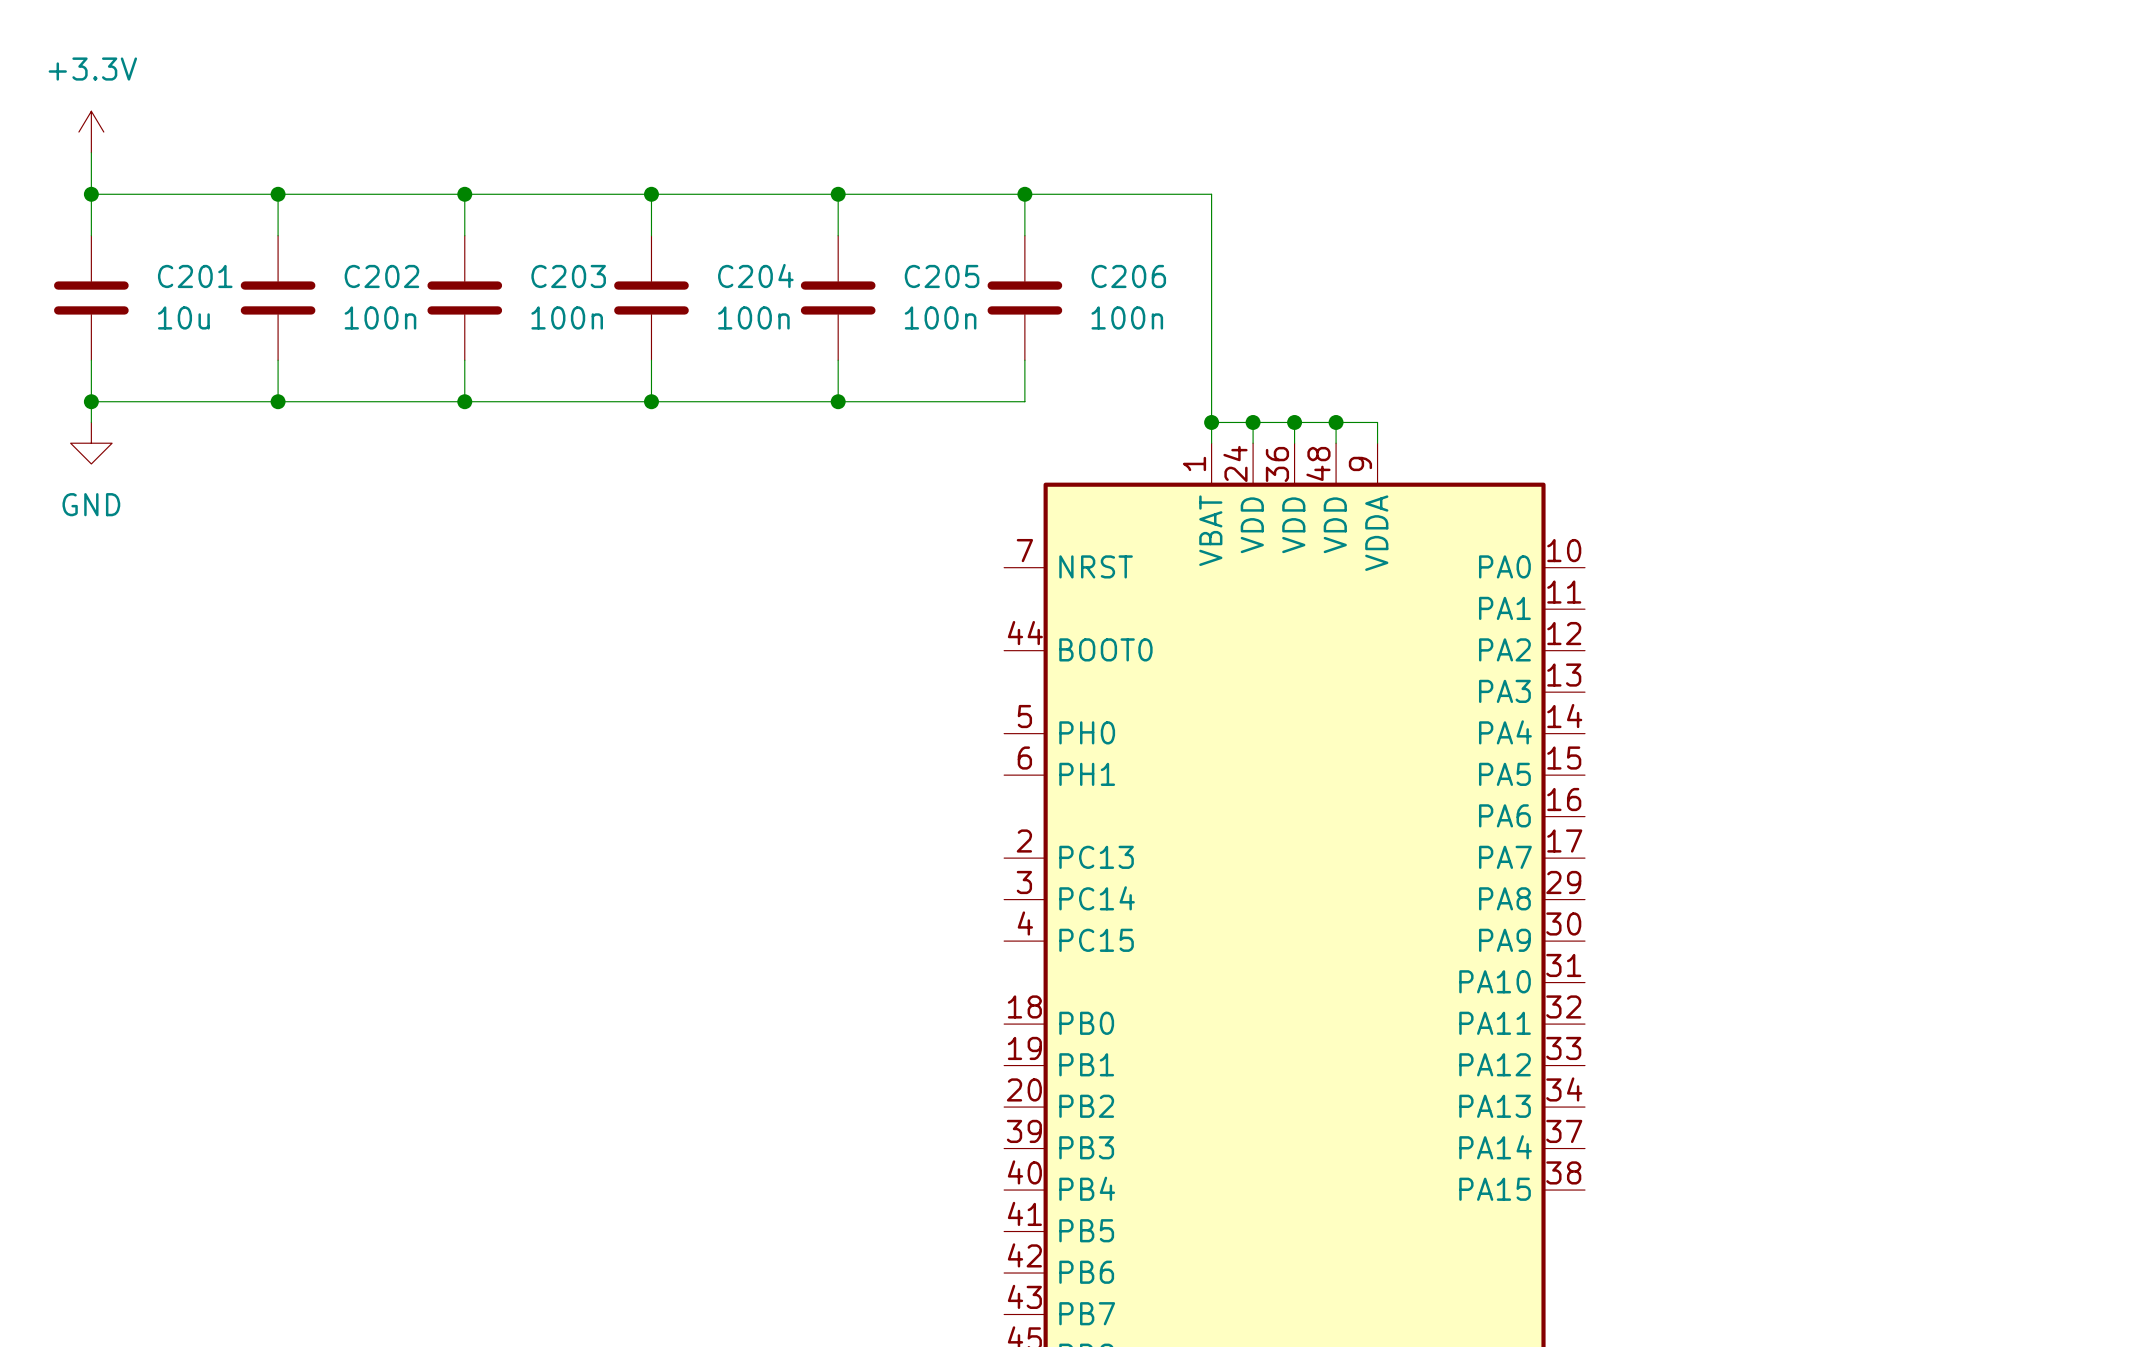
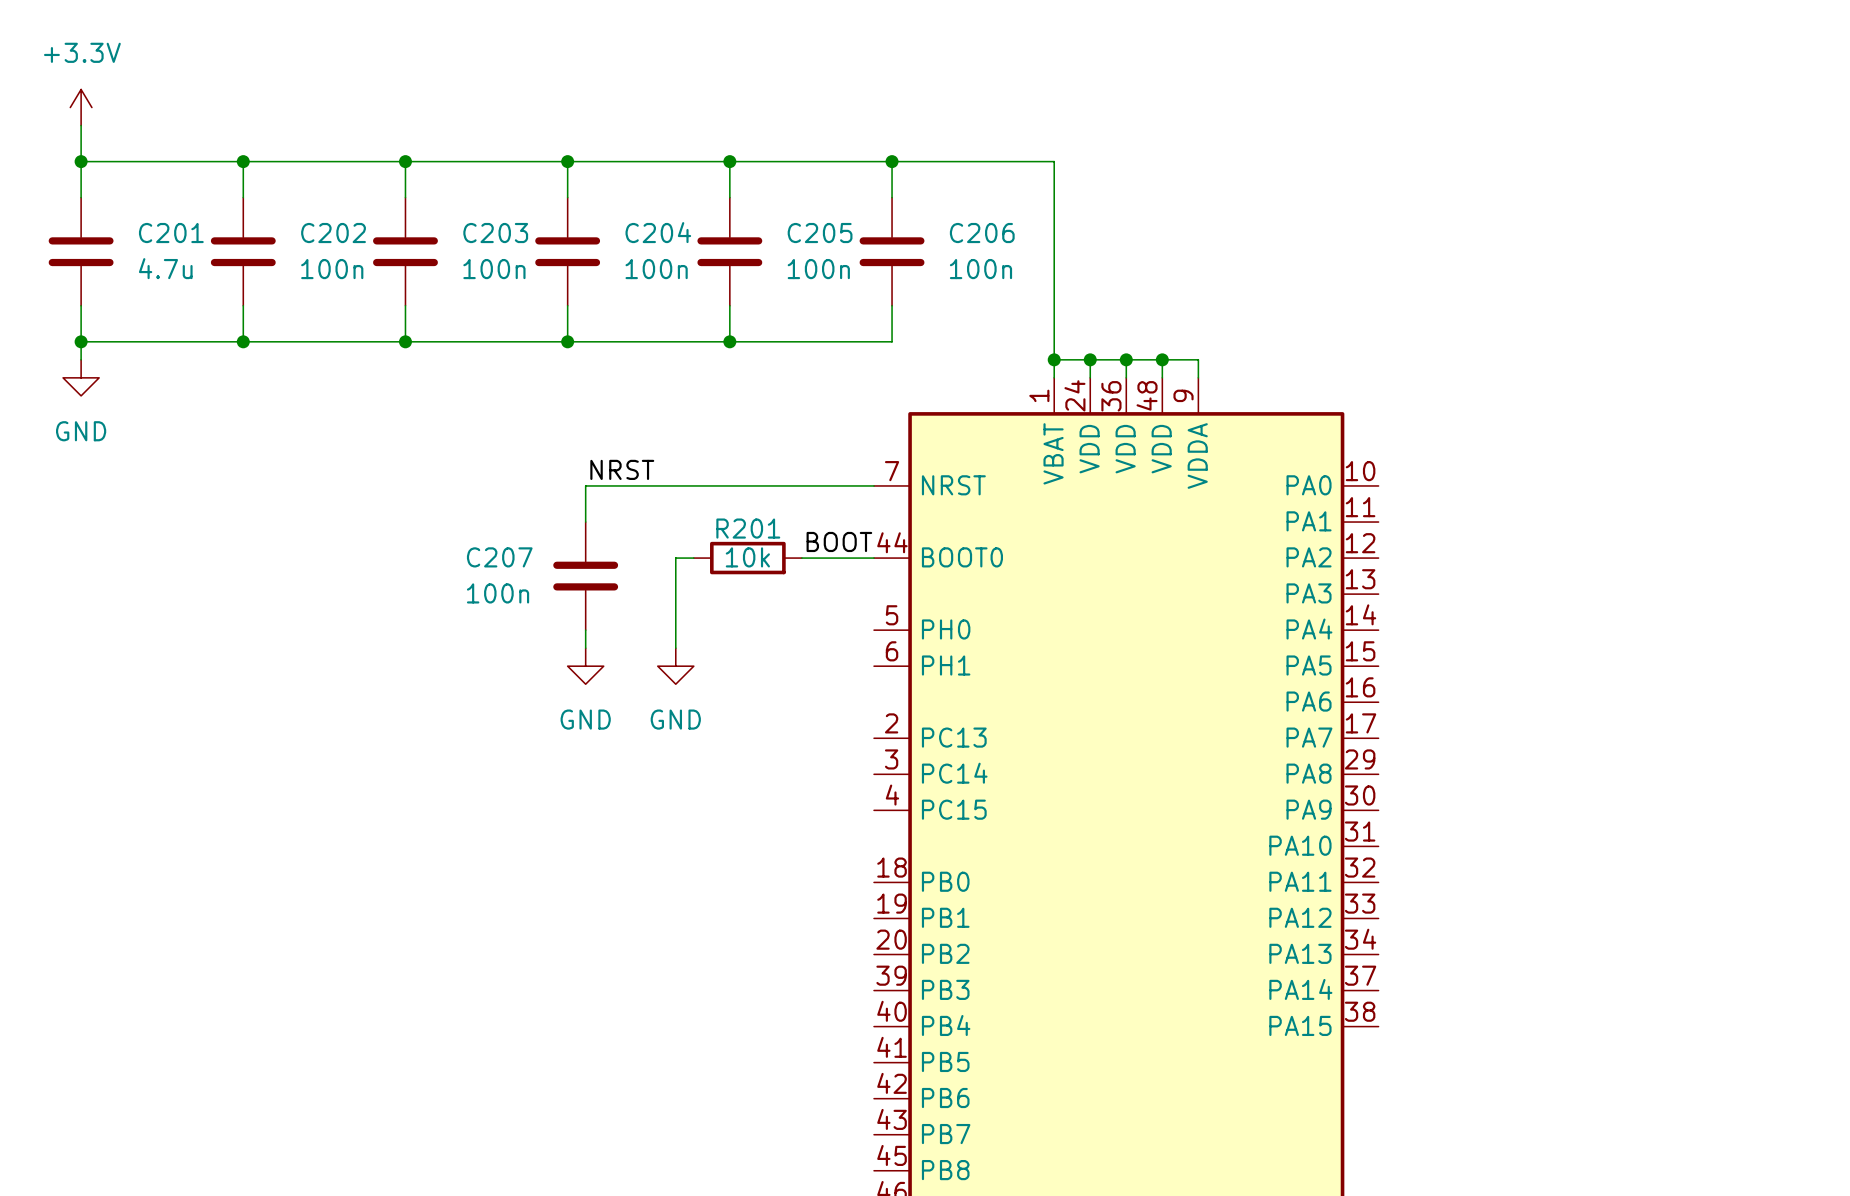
C201 value: 10u (183, 317) -> 4.7u (165, 268)
label: none -> NRST (622, 469)
wire: none -> (874, 485) (585, 485) (585, 522)
label: none -> BOOT (839, 541)
wire: none -> (693, 558) (675, 558) (675, 648)
R201: none -> 10k (747, 558)
wire: none -> (801, 558) (874, 558)
C207: none -> 100n (585, 576)
wire: none -> (585, 630) (585, 648)
power symbol: none -> GND (585, 666)
power symbol: none -> GND (675, 666)

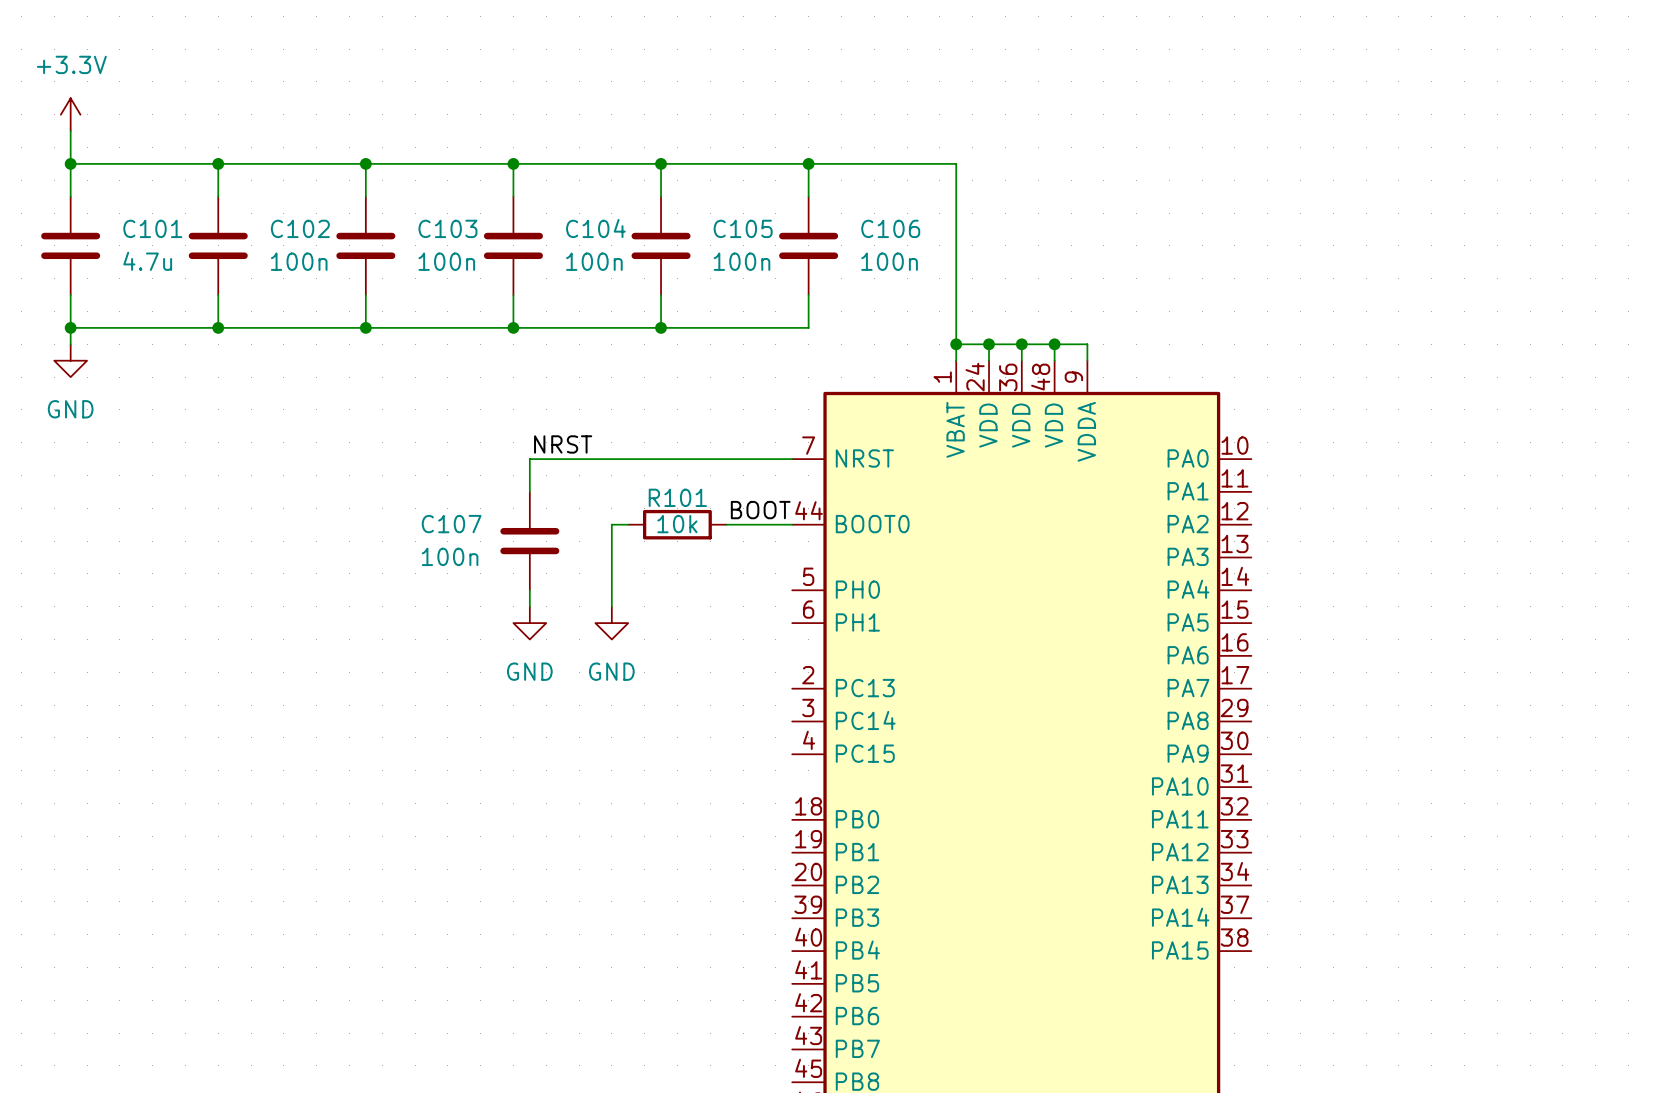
C204 name: C204 (658, 232) -> C104 (595, 228)
C201 name: C201 (171, 233) -> C101 (152, 228)
C202 name: C202 (333, 233) -> C102 (300, 228)
C203 name: C203 (495, 233) -> C103 (447, 228)
C205 name: C205 (820, 233) -> C105 (743, 228)
C206 name: C206 (982, 233) -> C106 (890, 228)
R201 name: R201 (748, 528) -> R101 (677, 497)
C207 name: C207 (499, 557) -> C107 (451, 524)

